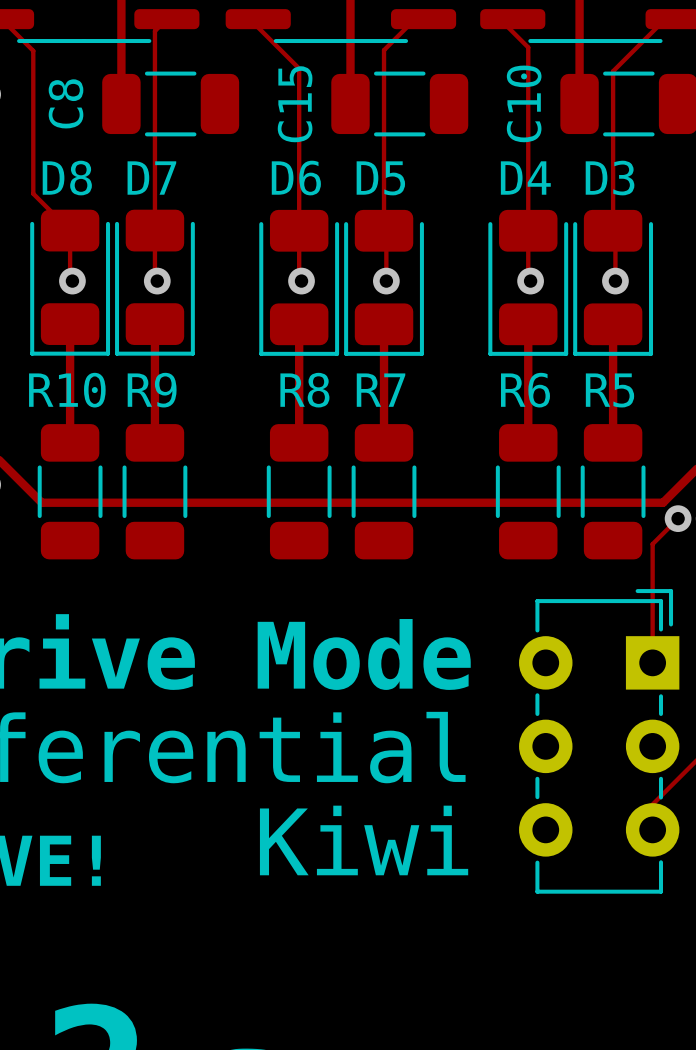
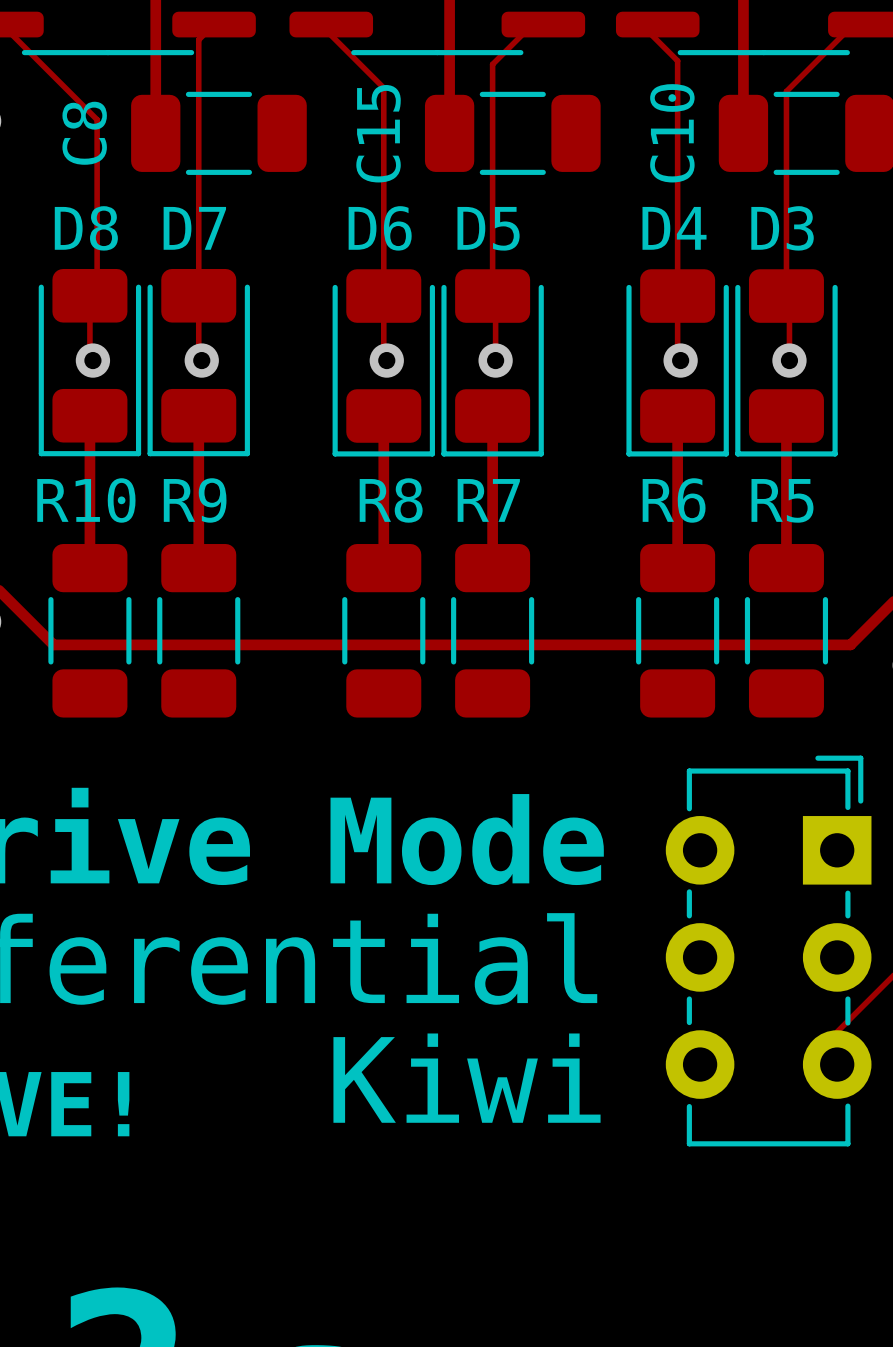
track: (33, 50) (33, 193) (70, 230) -> (42, 65) (97, 119) (97, 288) (89, 295)
track: (678, 518) (652, 544) (652, 637) -> none
via: (678, 518) -> none

